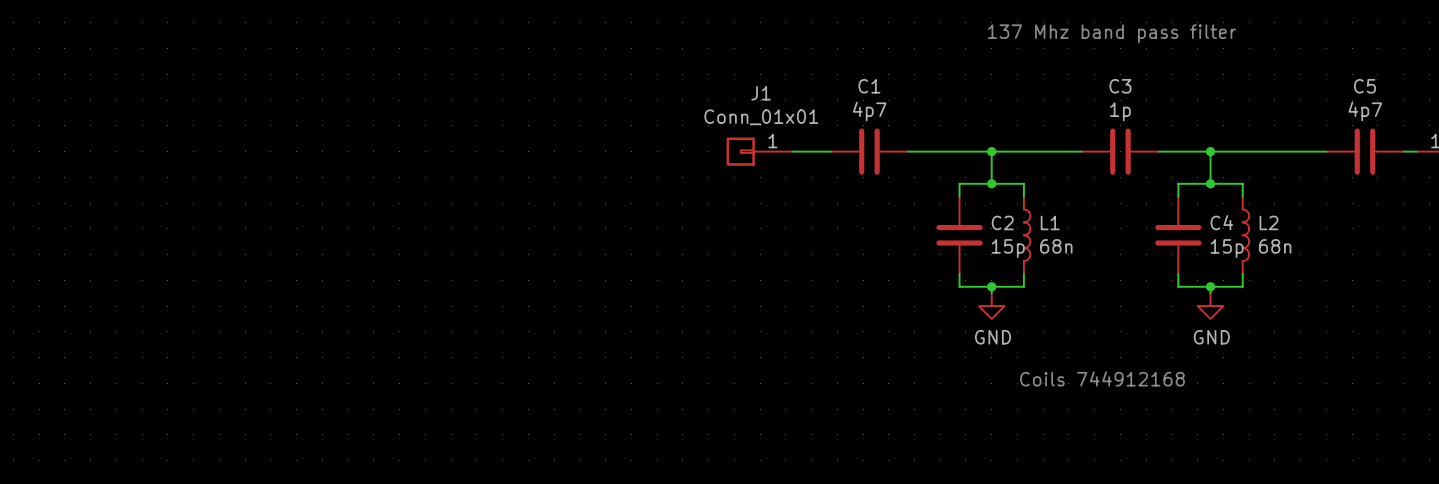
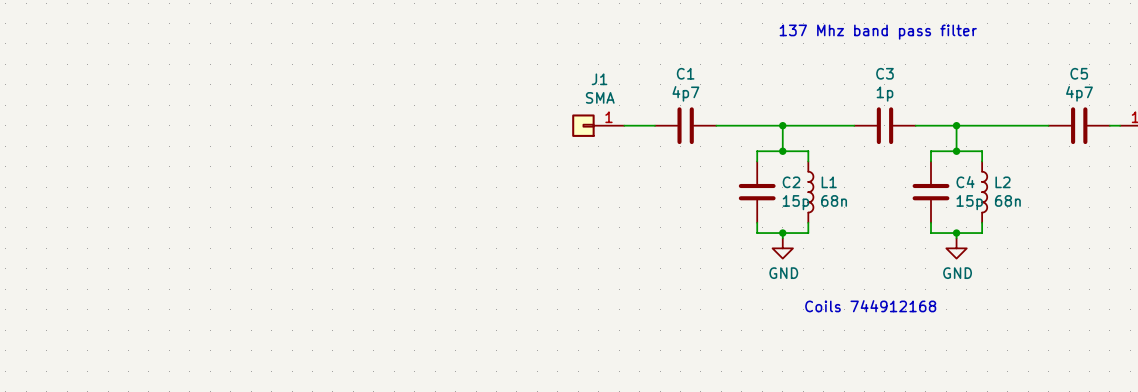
J1 value: Conn_01x01 (761, 117) -> SMA (600, 97)

